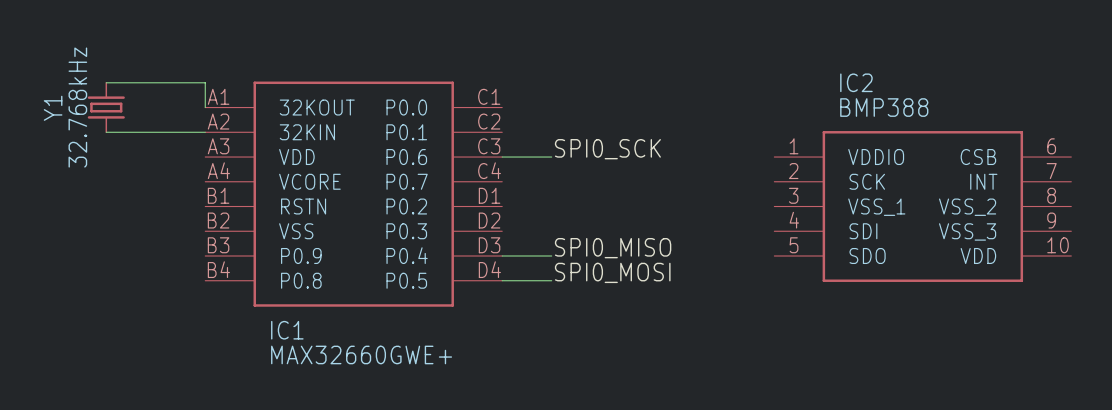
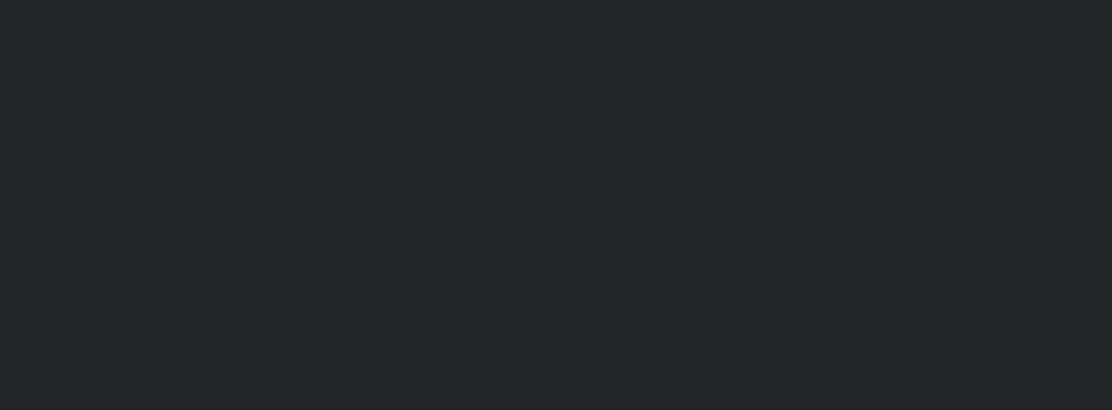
wire: (106, 82) (205, 82) (205, 107) -> none
Y1: 32.768kHz (106, 107) -> none
wire: (106, 132) (205, 132) -> none
label: SPI0_SCK (607, 149) -> none
wire: (502, 157) (551, 157) -> none
IC1: MAX32660GWE+ (353, 194) -> none
IC2: BMP388 (922, 206) -> none
label: SPI0_MISO (613, 248) -> none
wire: (502, 255) (551, 255) -> none
label: SPI0_MOSI (612, 272) -> none
wire: (502, 280) (551, 280) -> none

